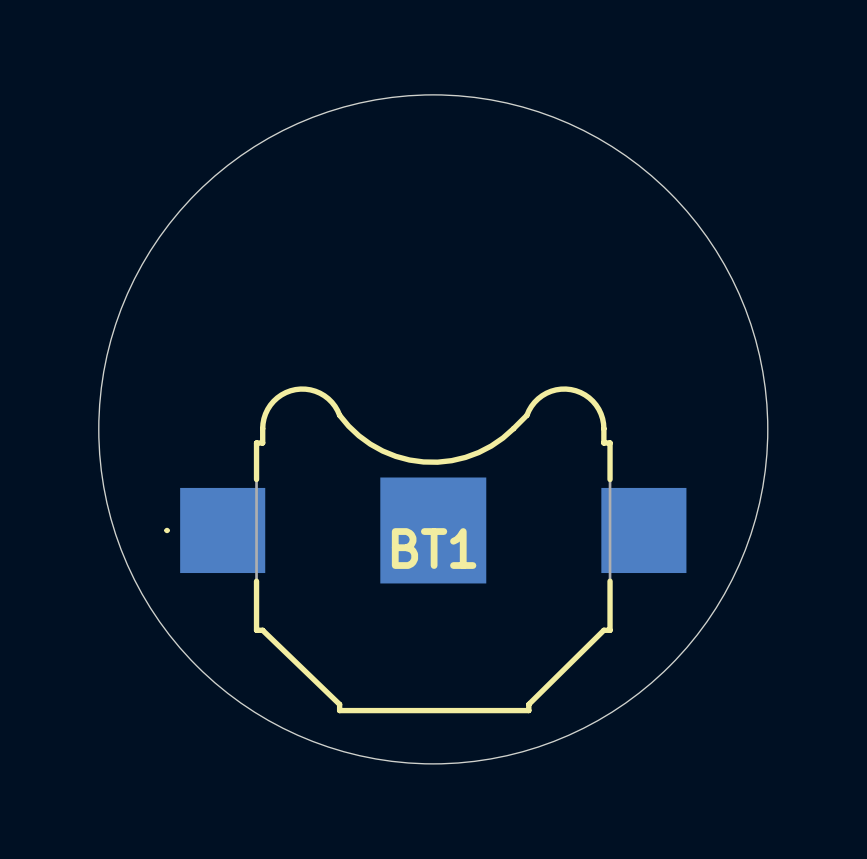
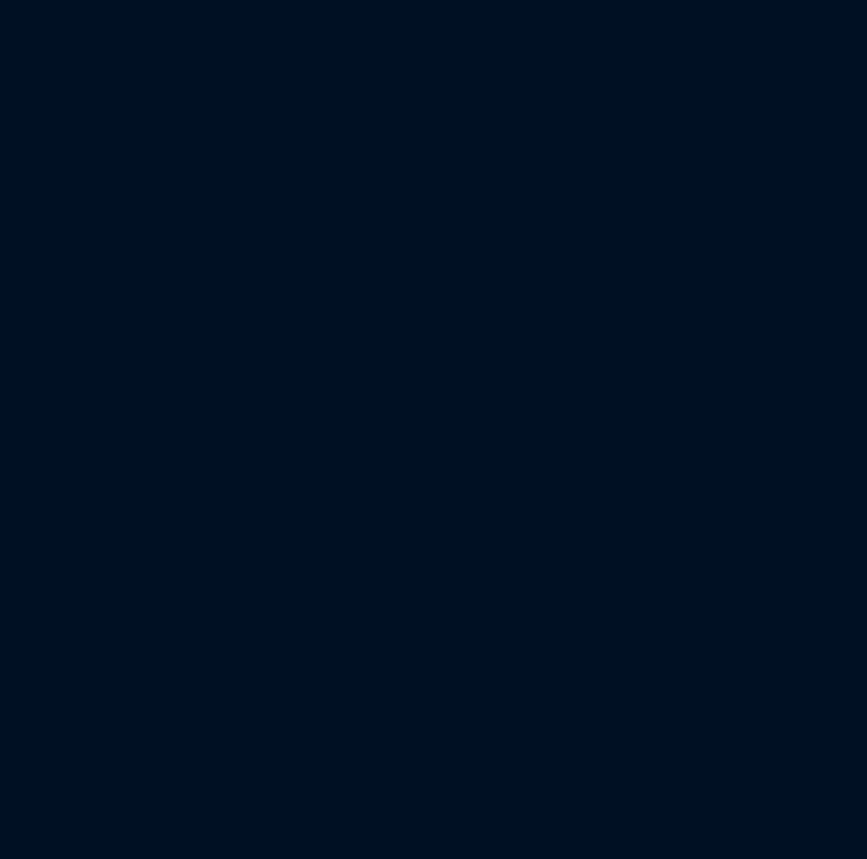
round board edge: [98, 94, 769, 765] -> none
BT1: (425, 549) -> none

